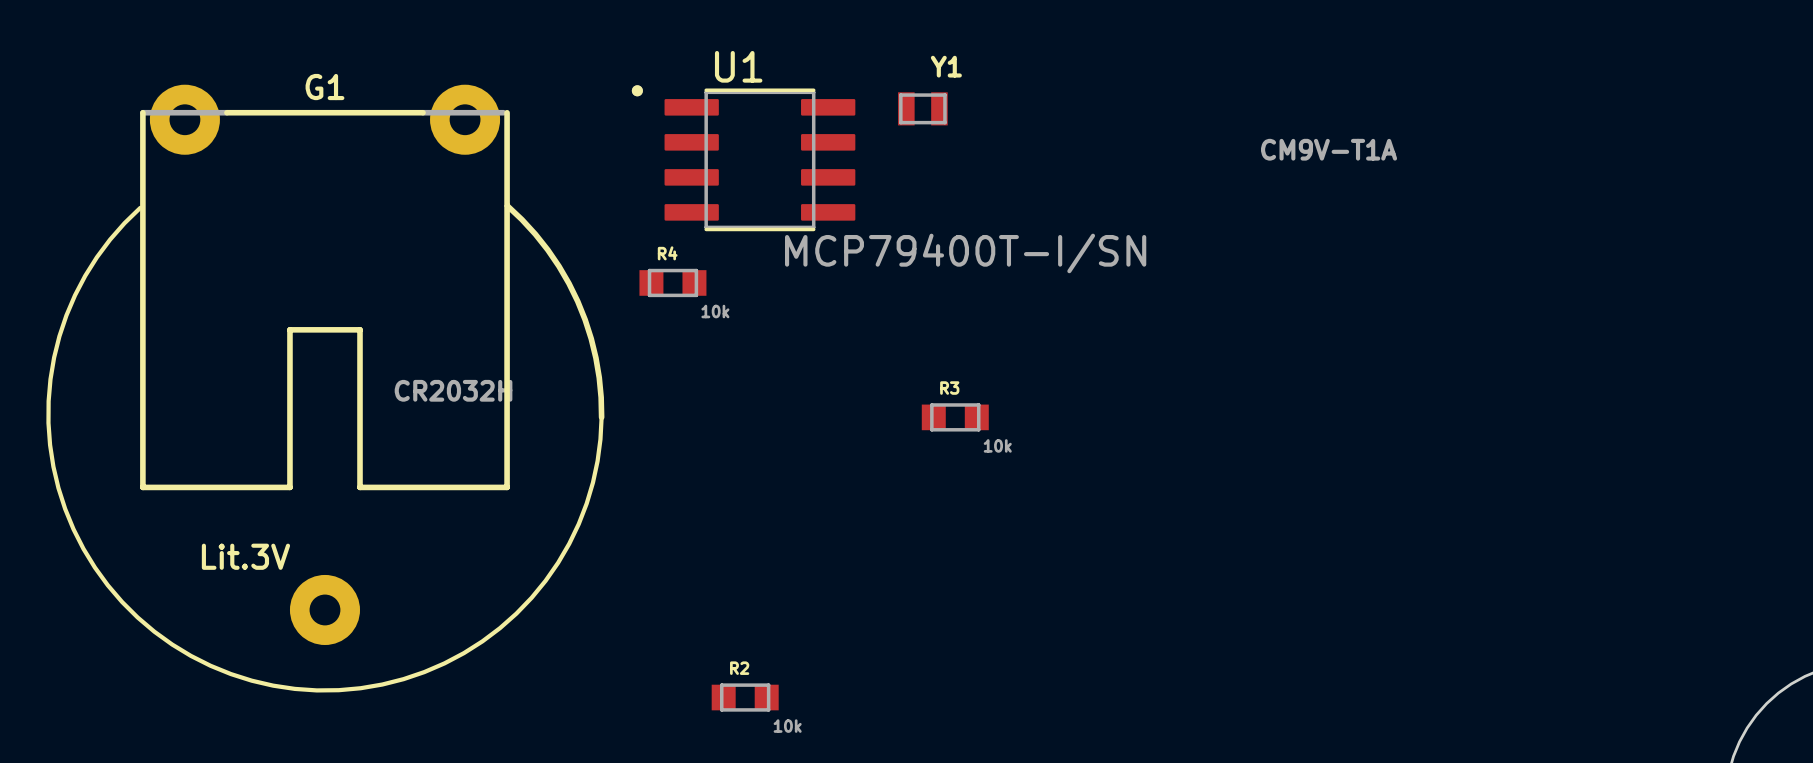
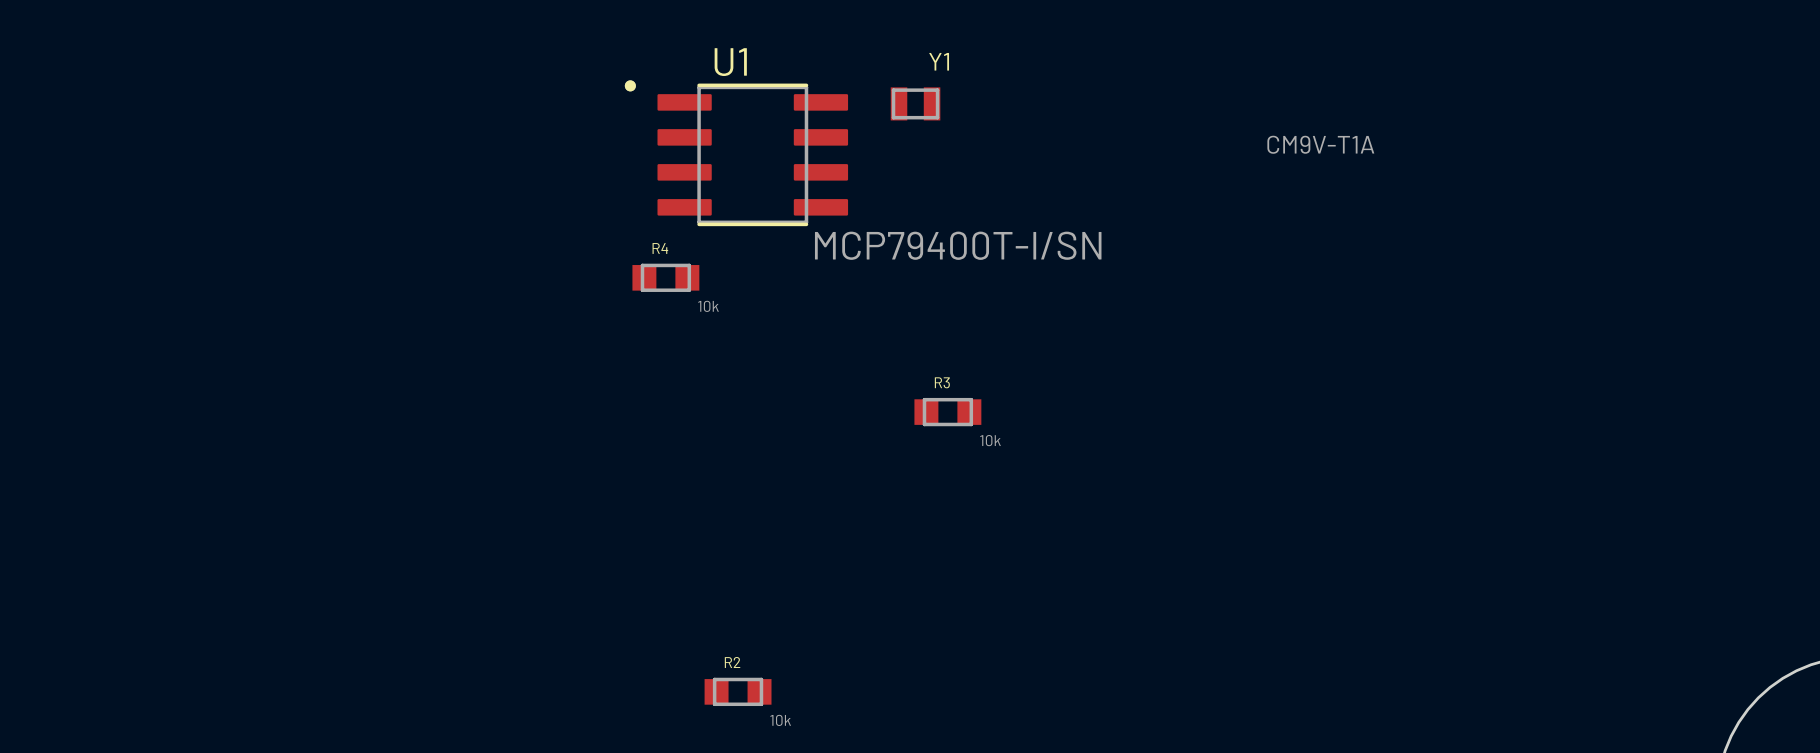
G1: CR2032H (325, 388) -> none

